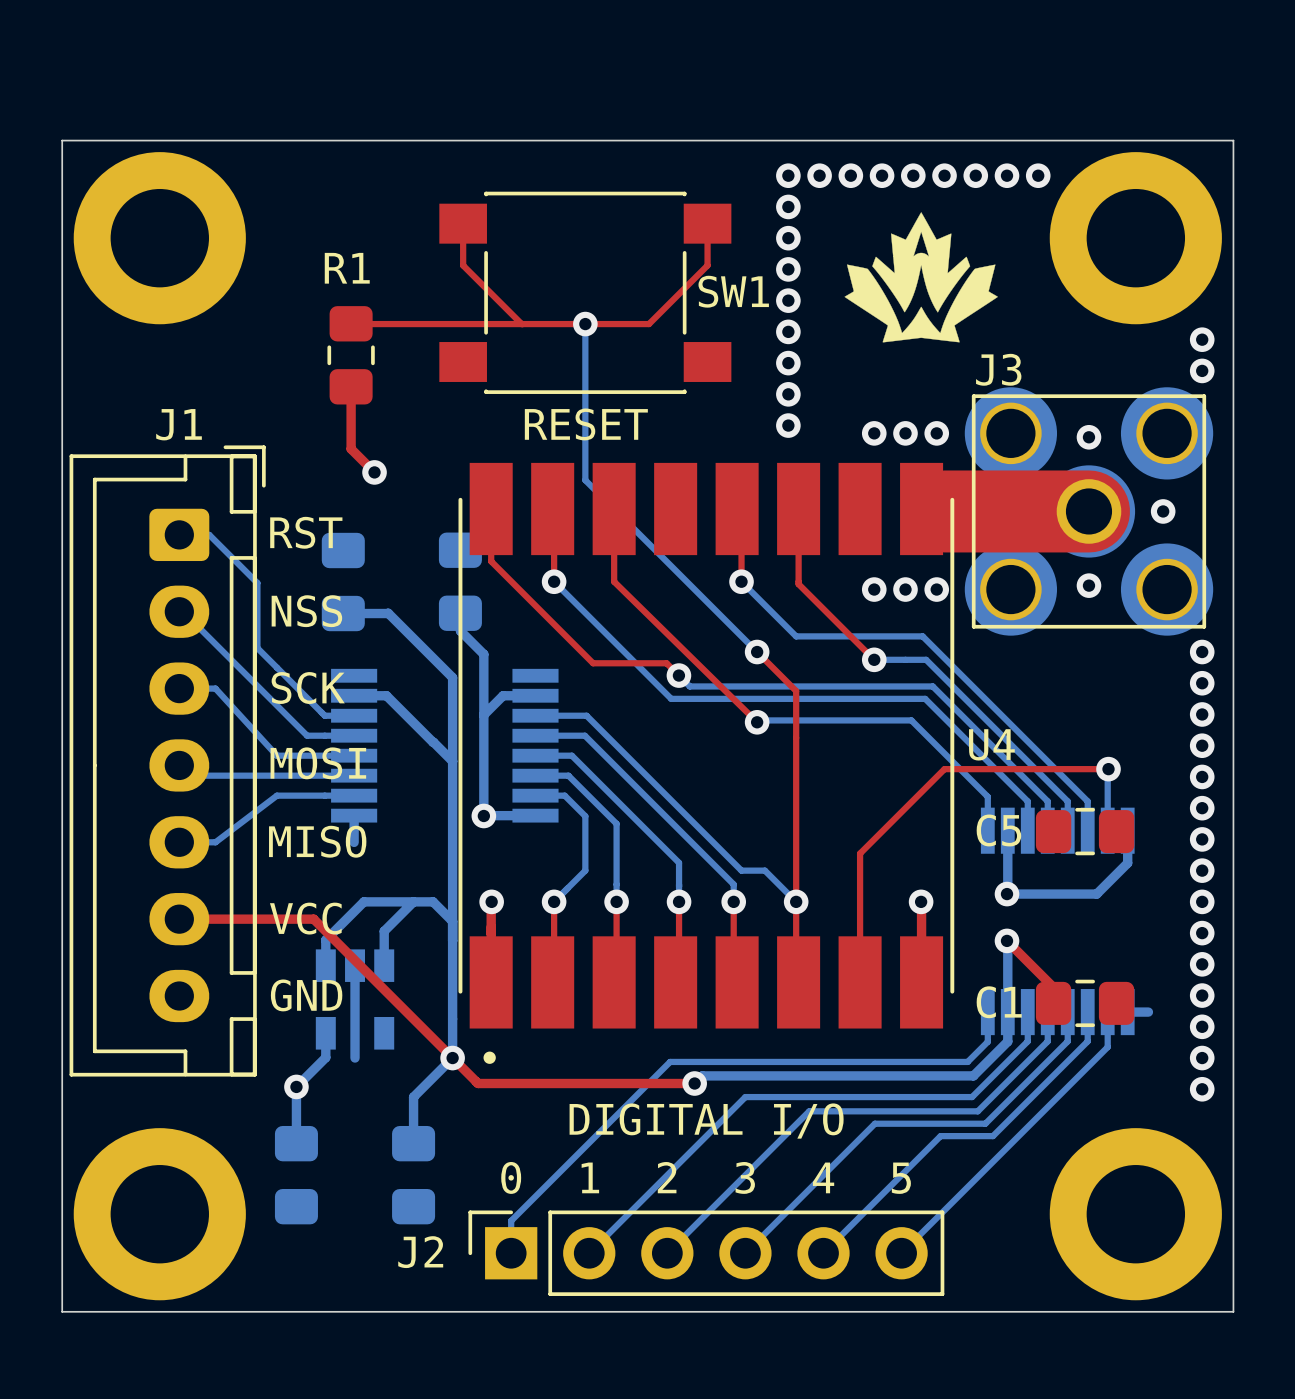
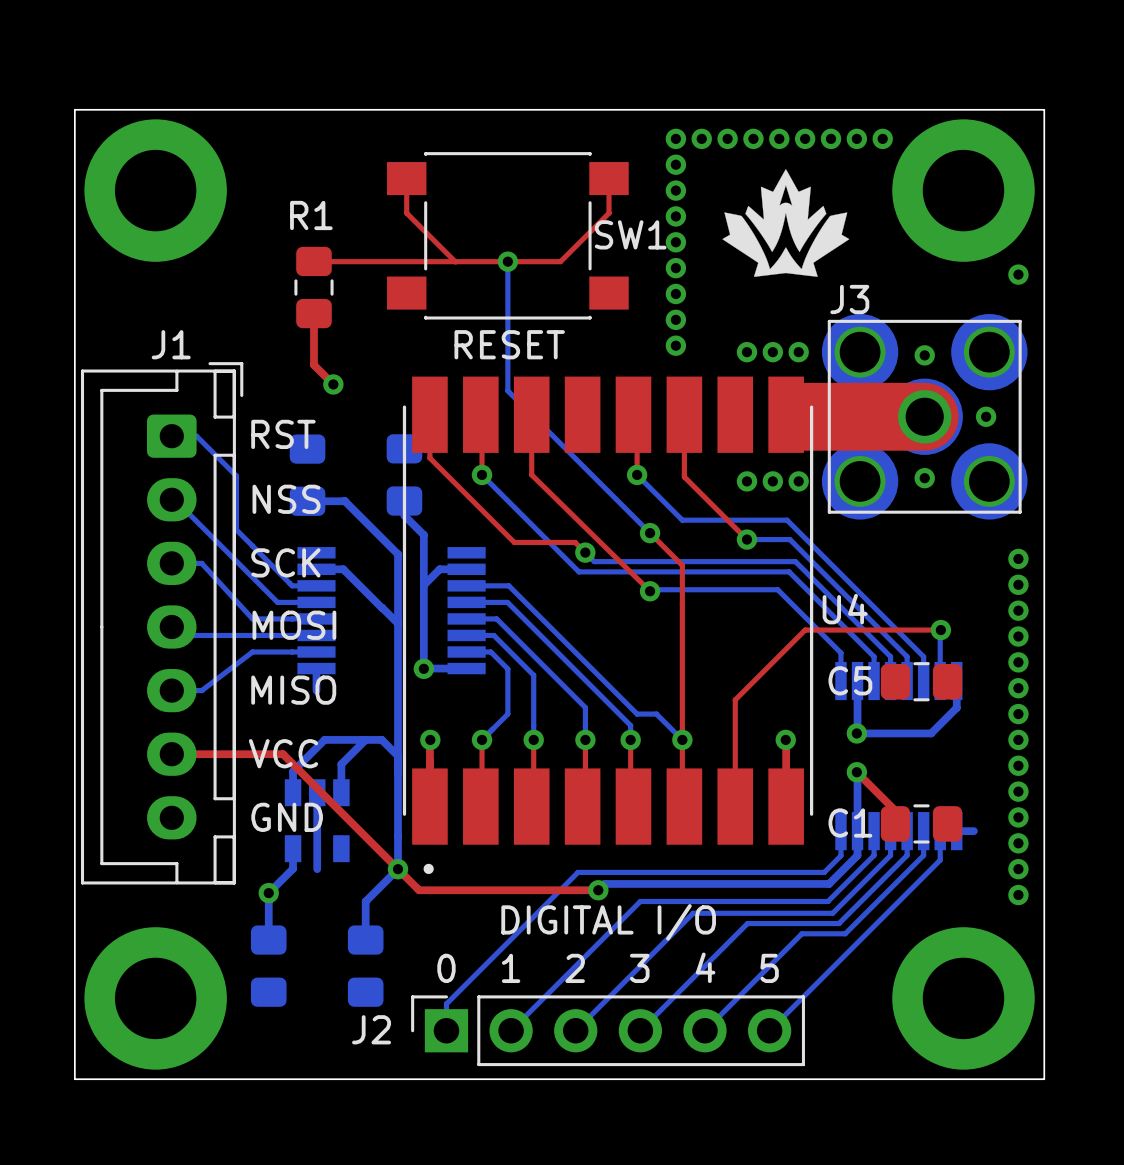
via: (1202, 370) -> none
via: (1202, 652) -> none

